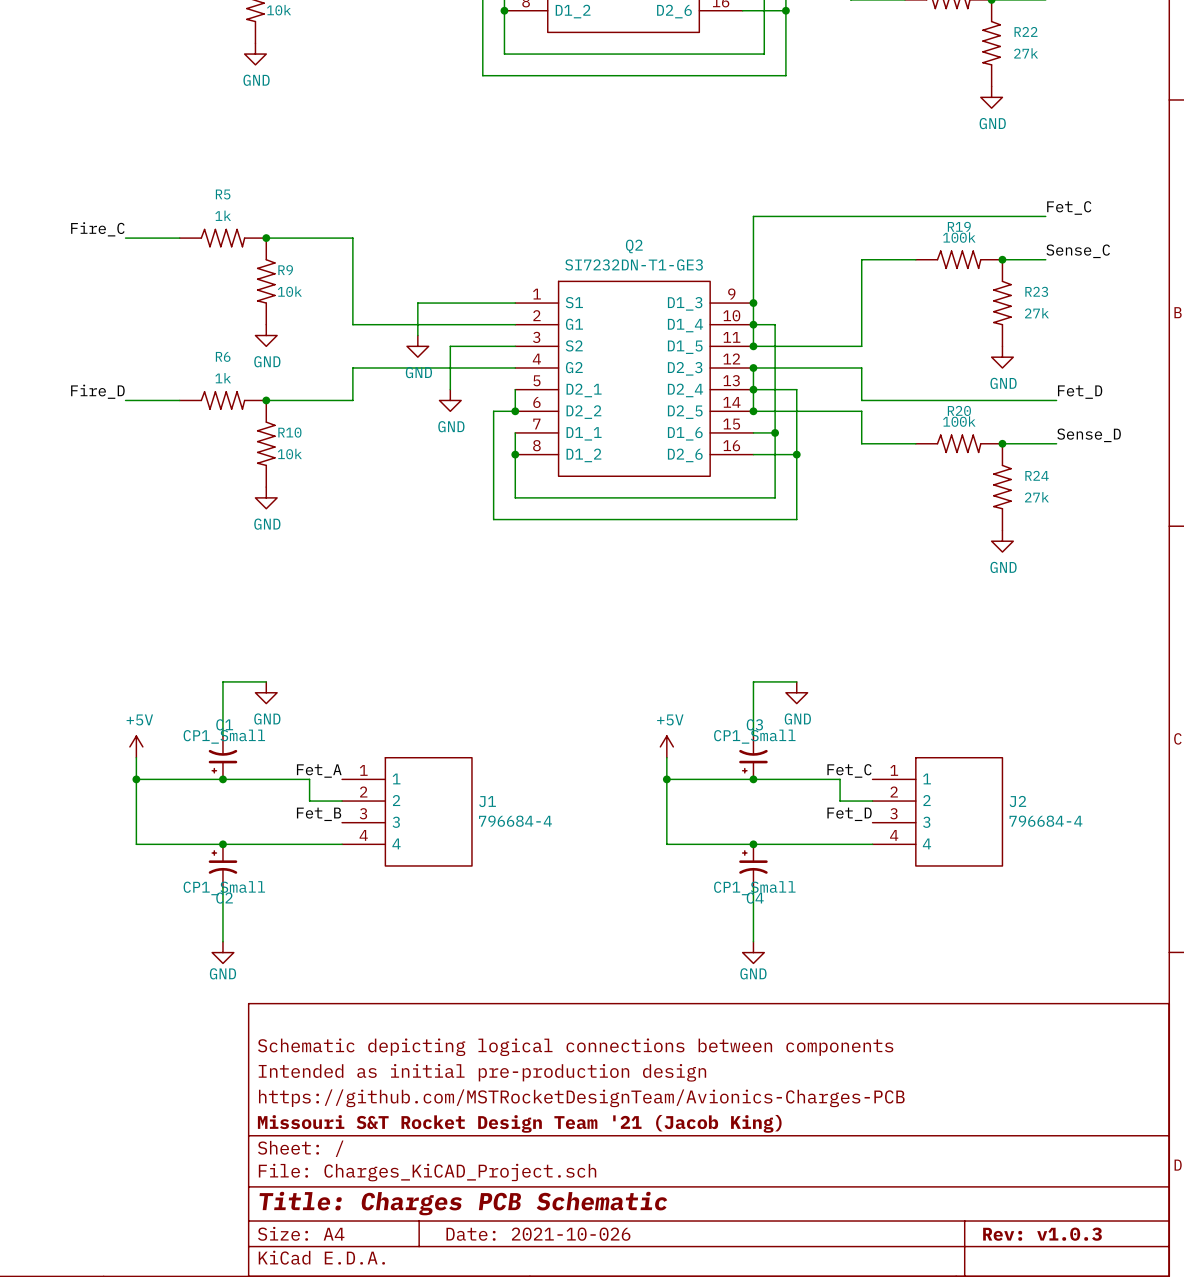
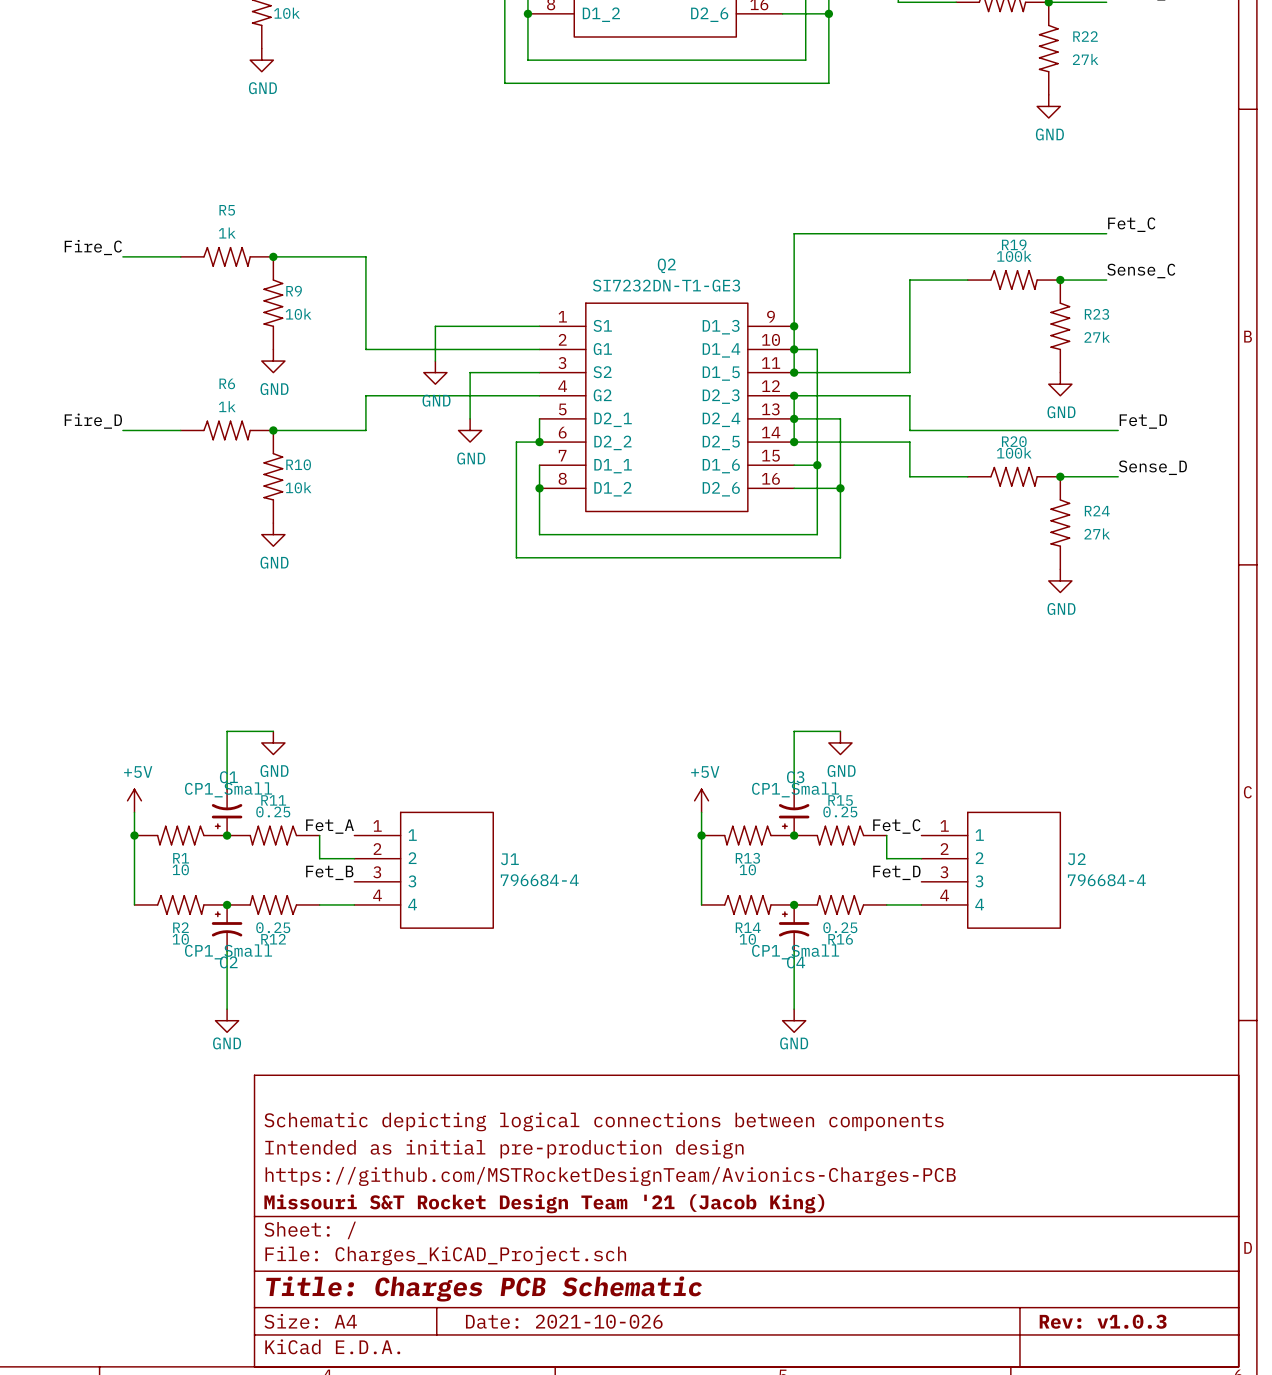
R1: none -> 10 (180, 835)
R11: none -> 0.25 (273, 835)
R13: none -> 10 (747, 835)
R15: none -> 0.25 (840, 835)
R2: none -> 10 (180, 904)
R12: none -> 0.25 (273, 904)
R14: none -> 10 (747, 904)
R16: none -> 0.25 (840, 904)

